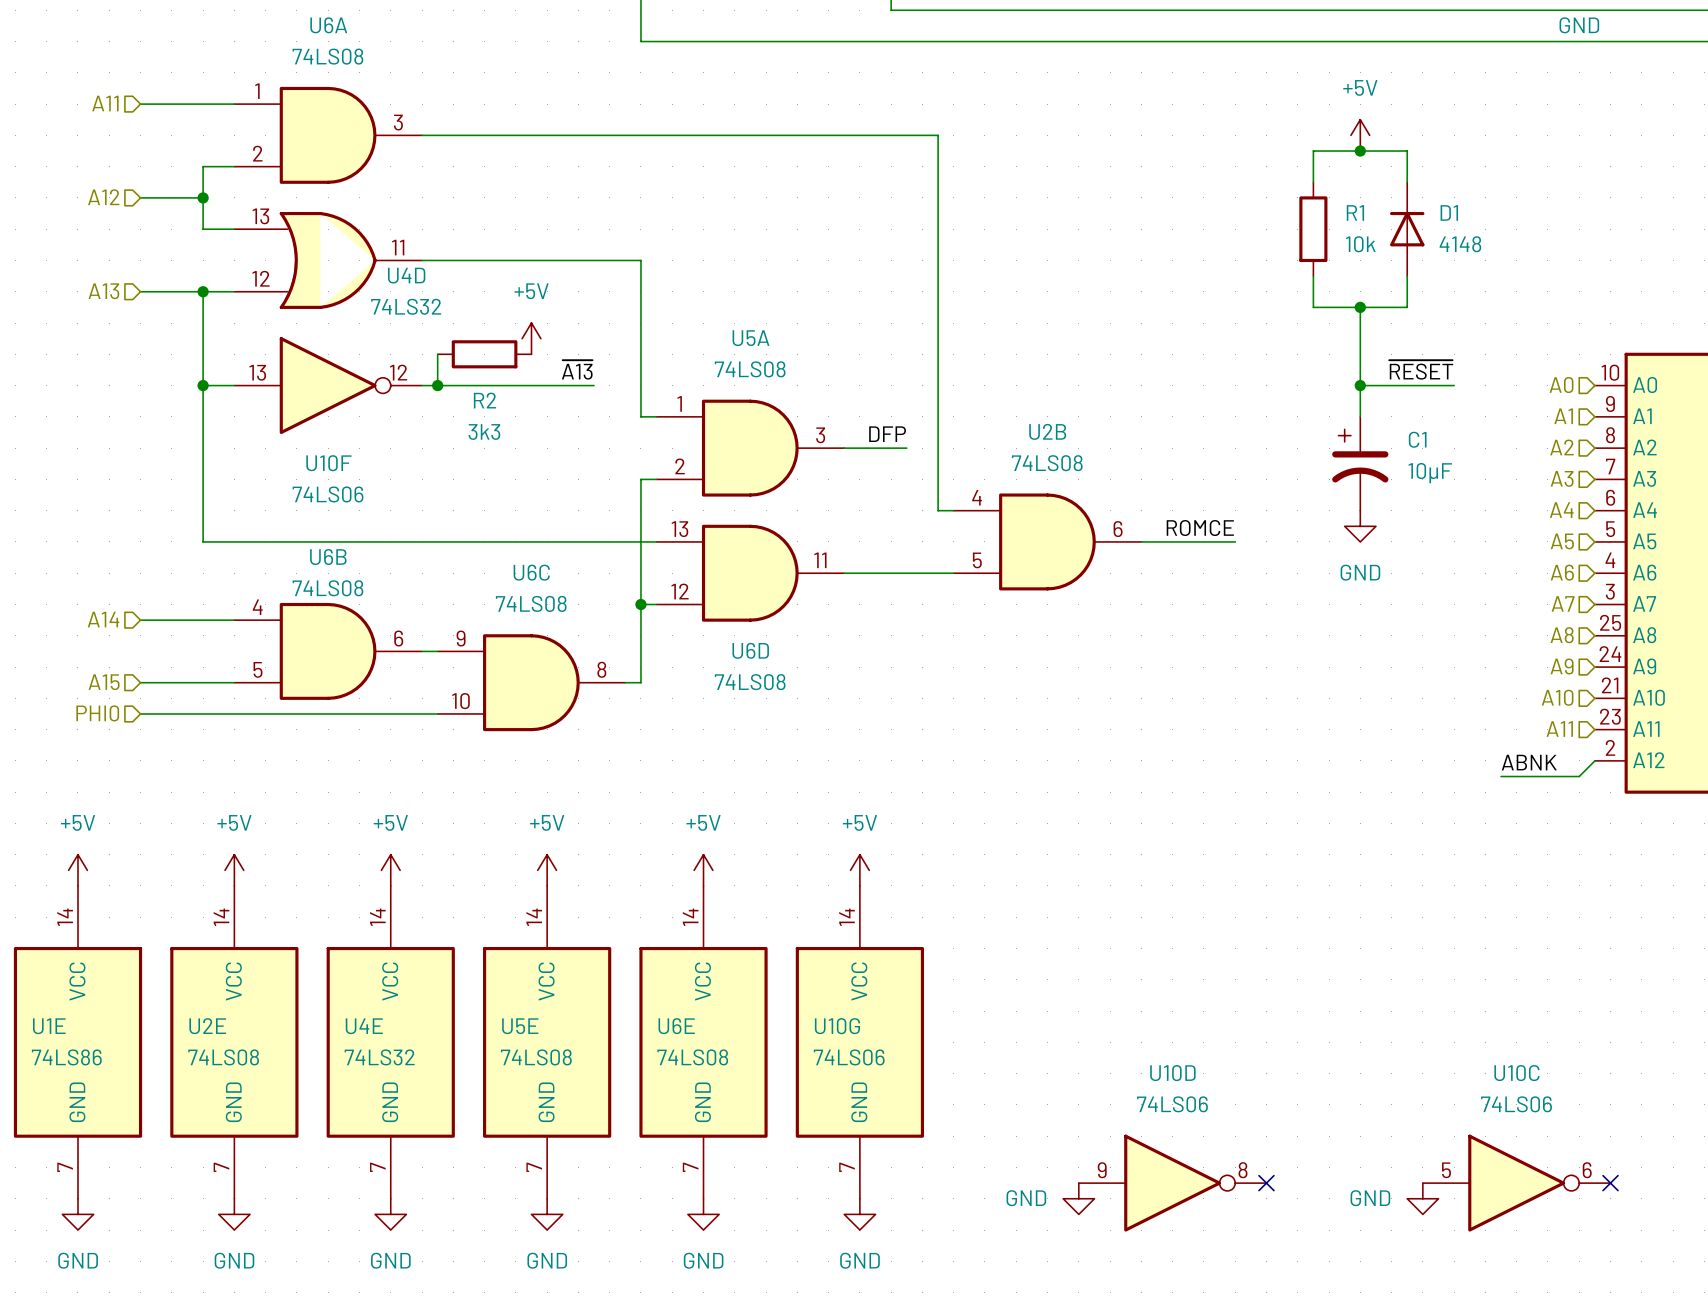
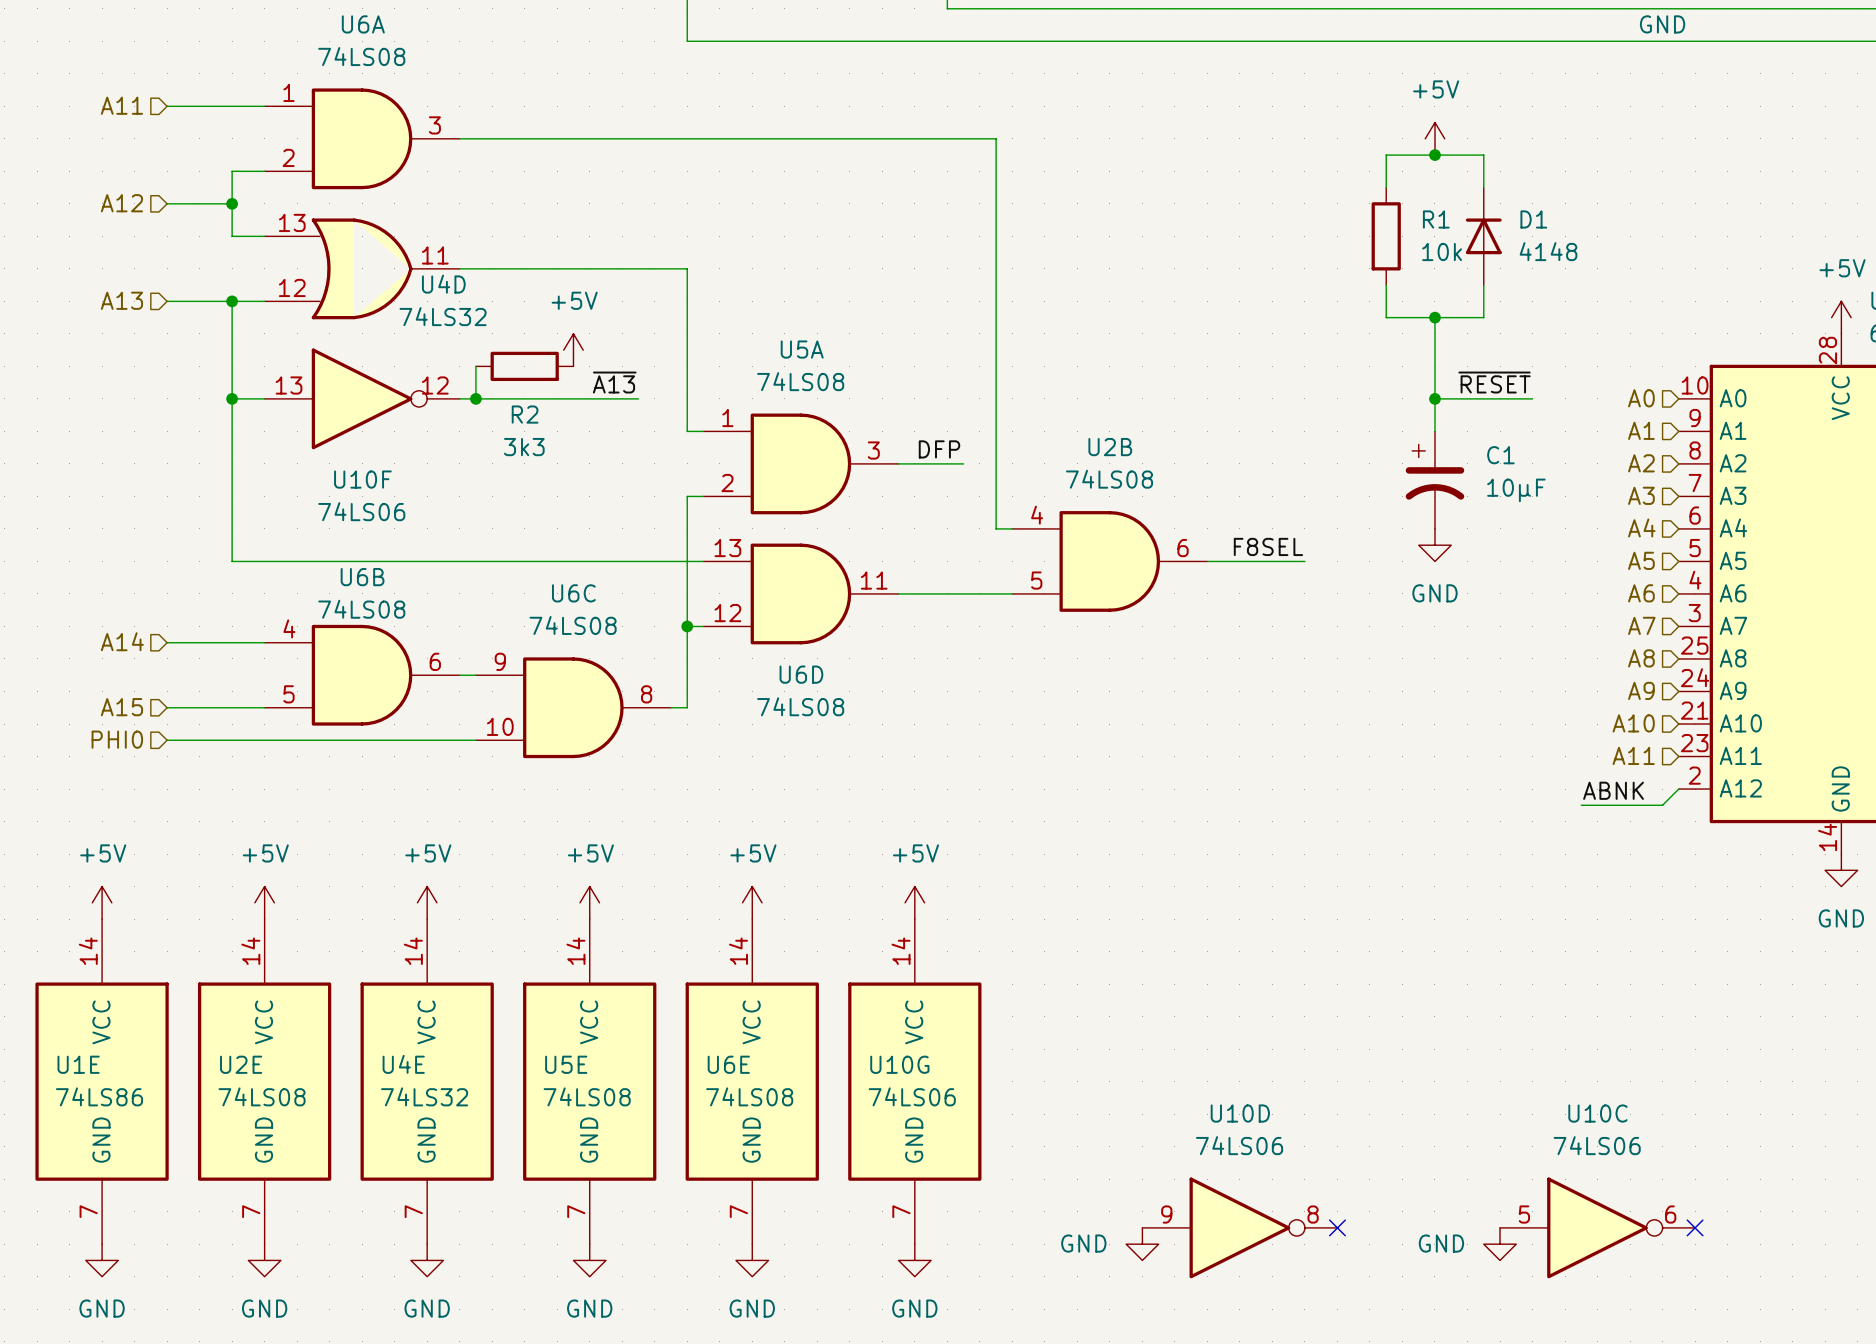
label: ROMCE (1200, 528) -> F8SEL (1268, 546)

